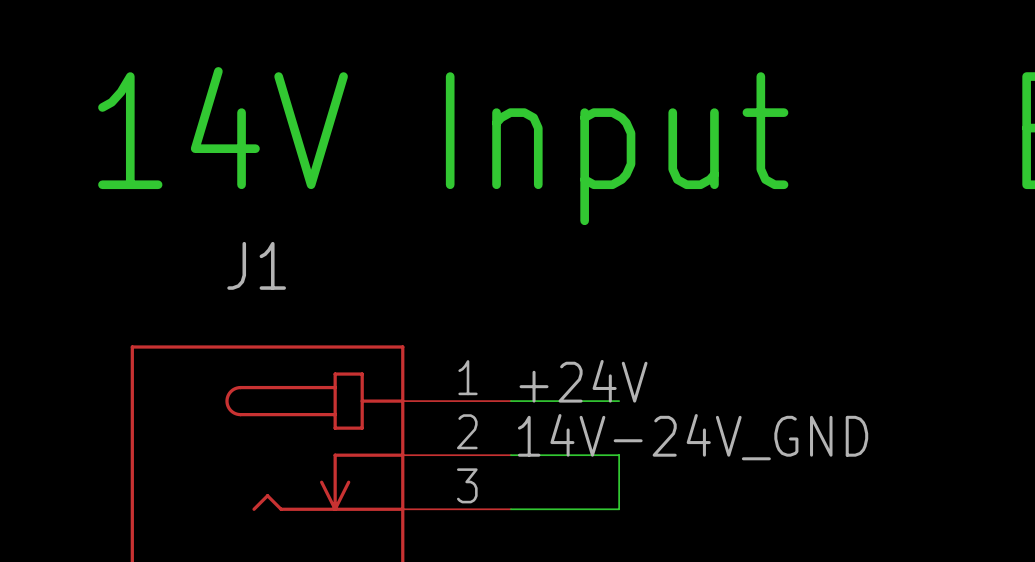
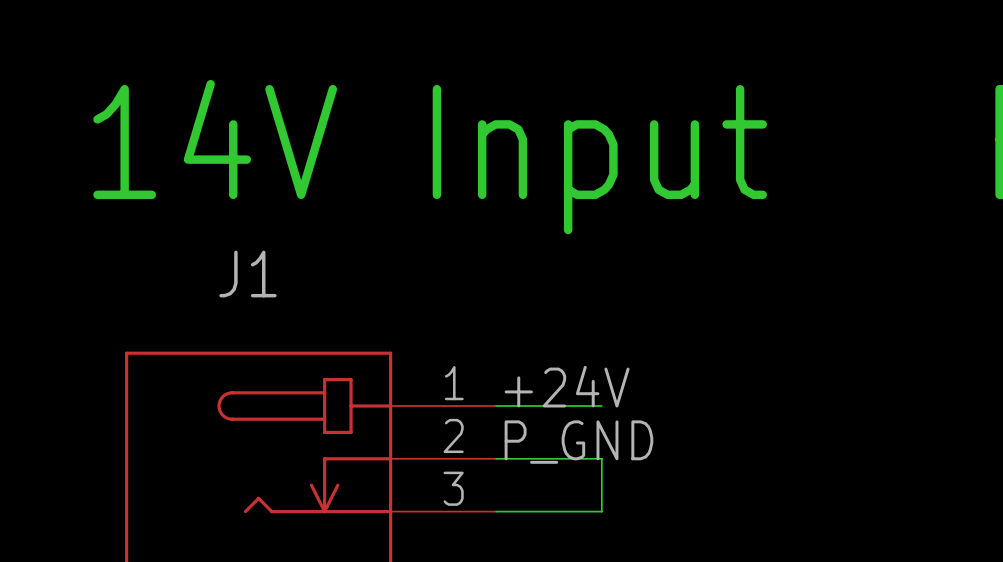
label: 14V-24V_GND (693, 437) -> P_GND (578, 442)

